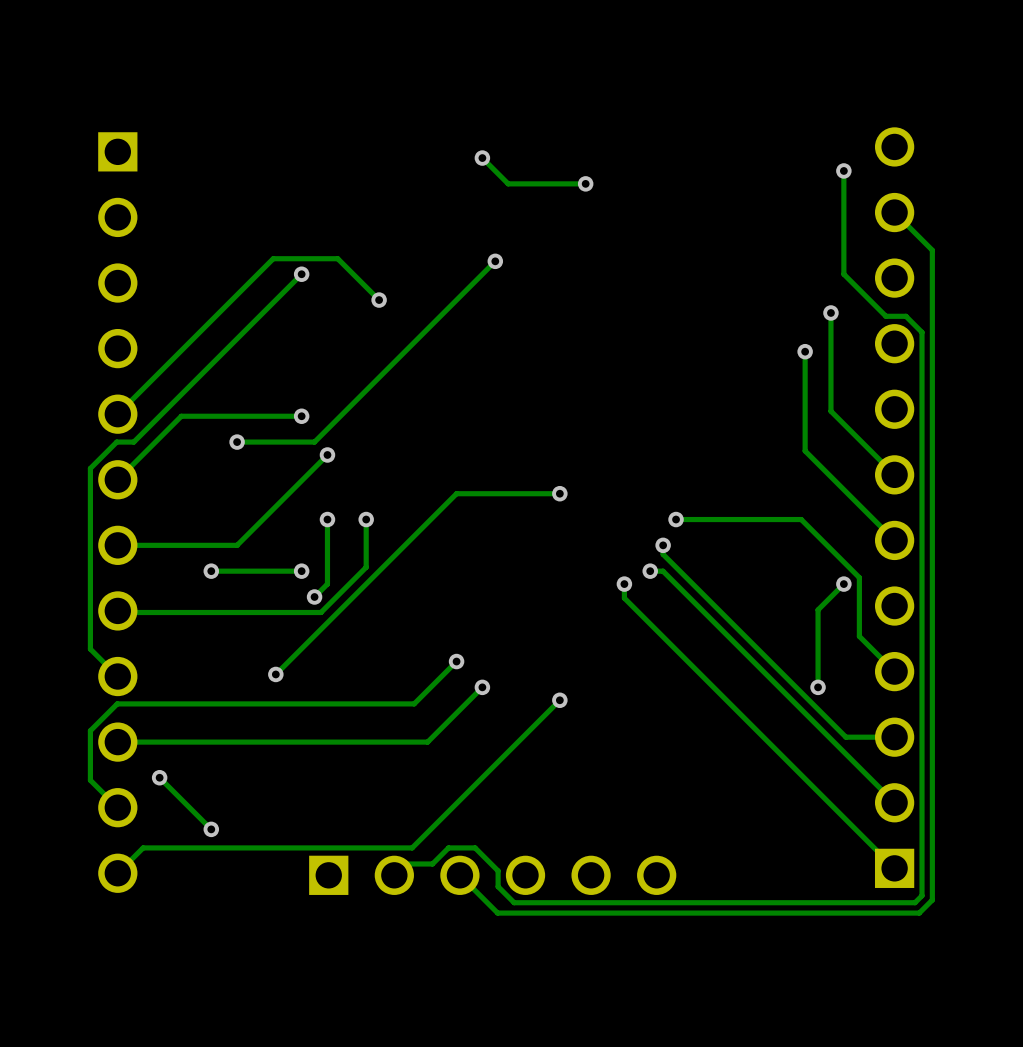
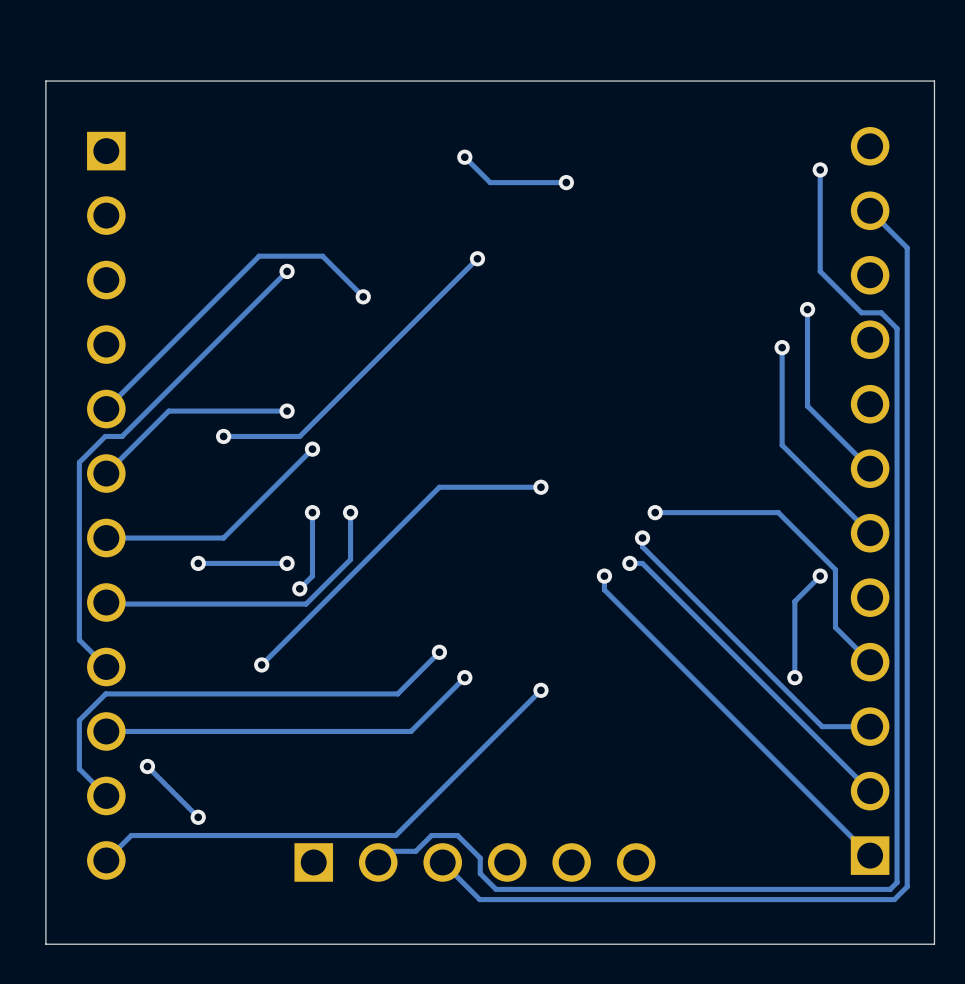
board edge: none -> (934, 81) (45, 81) (45, 944) (934, 944) (934, 81)

